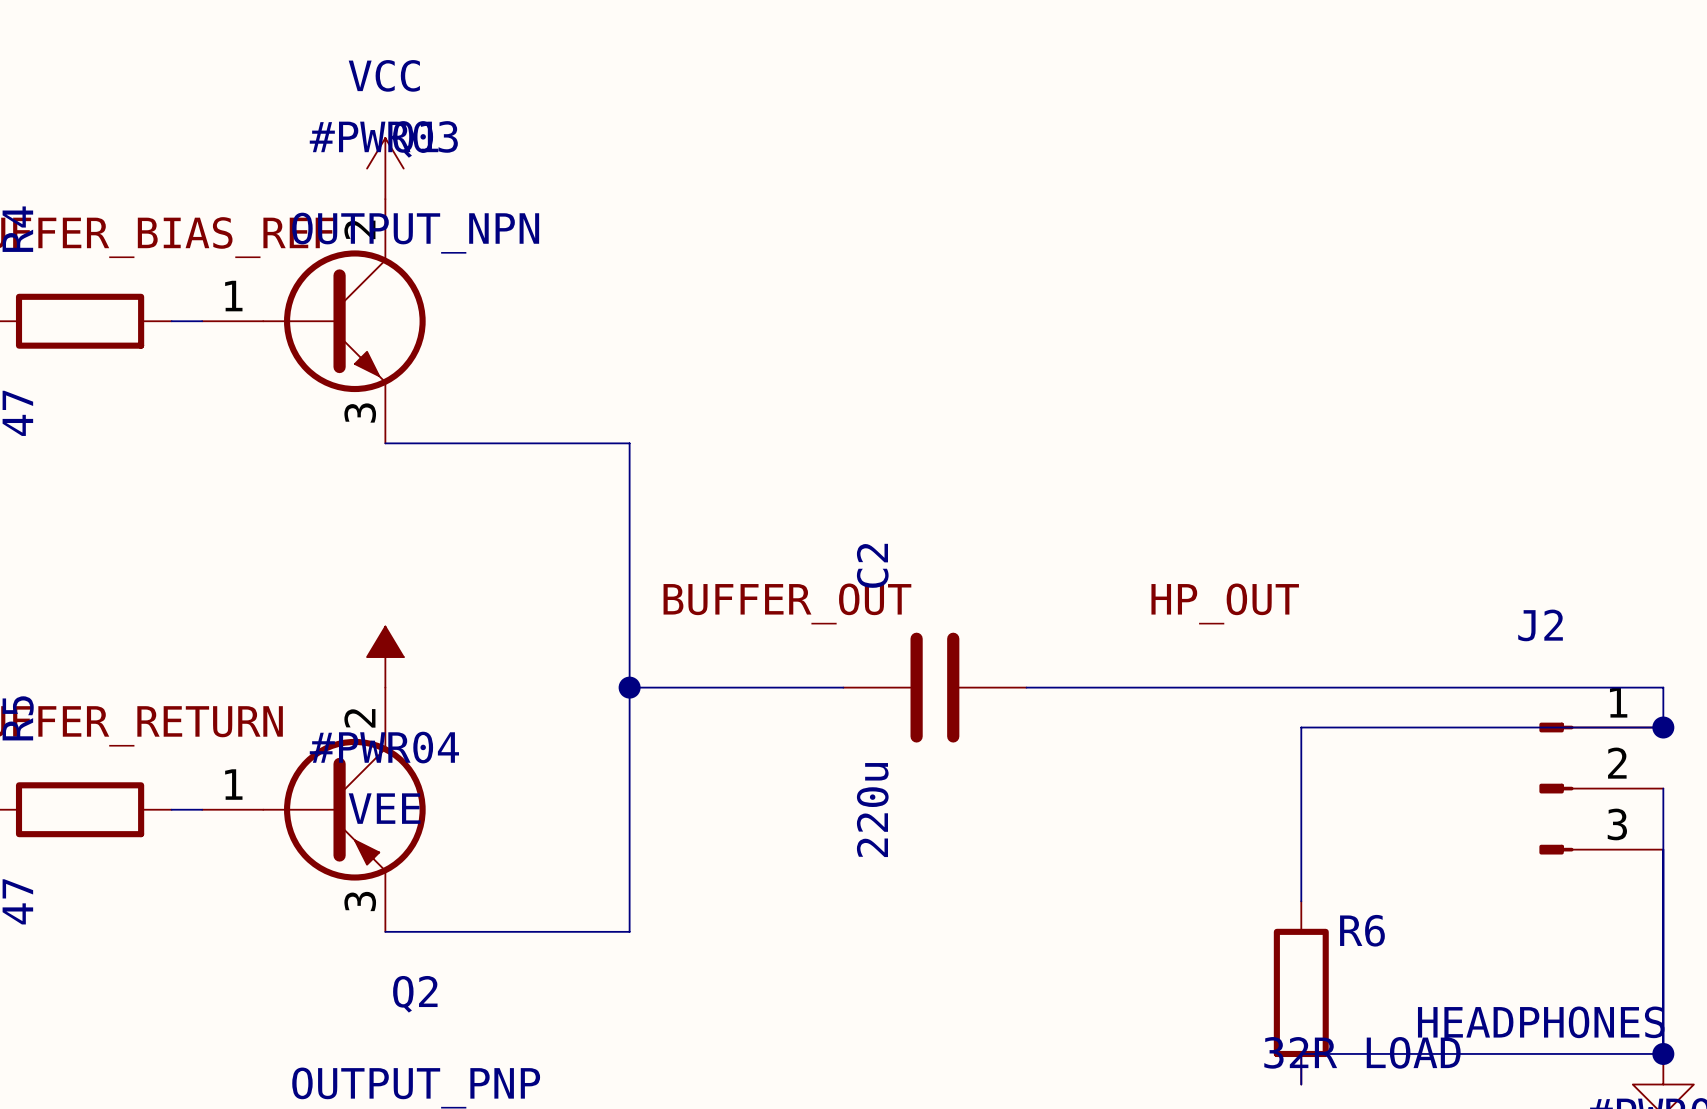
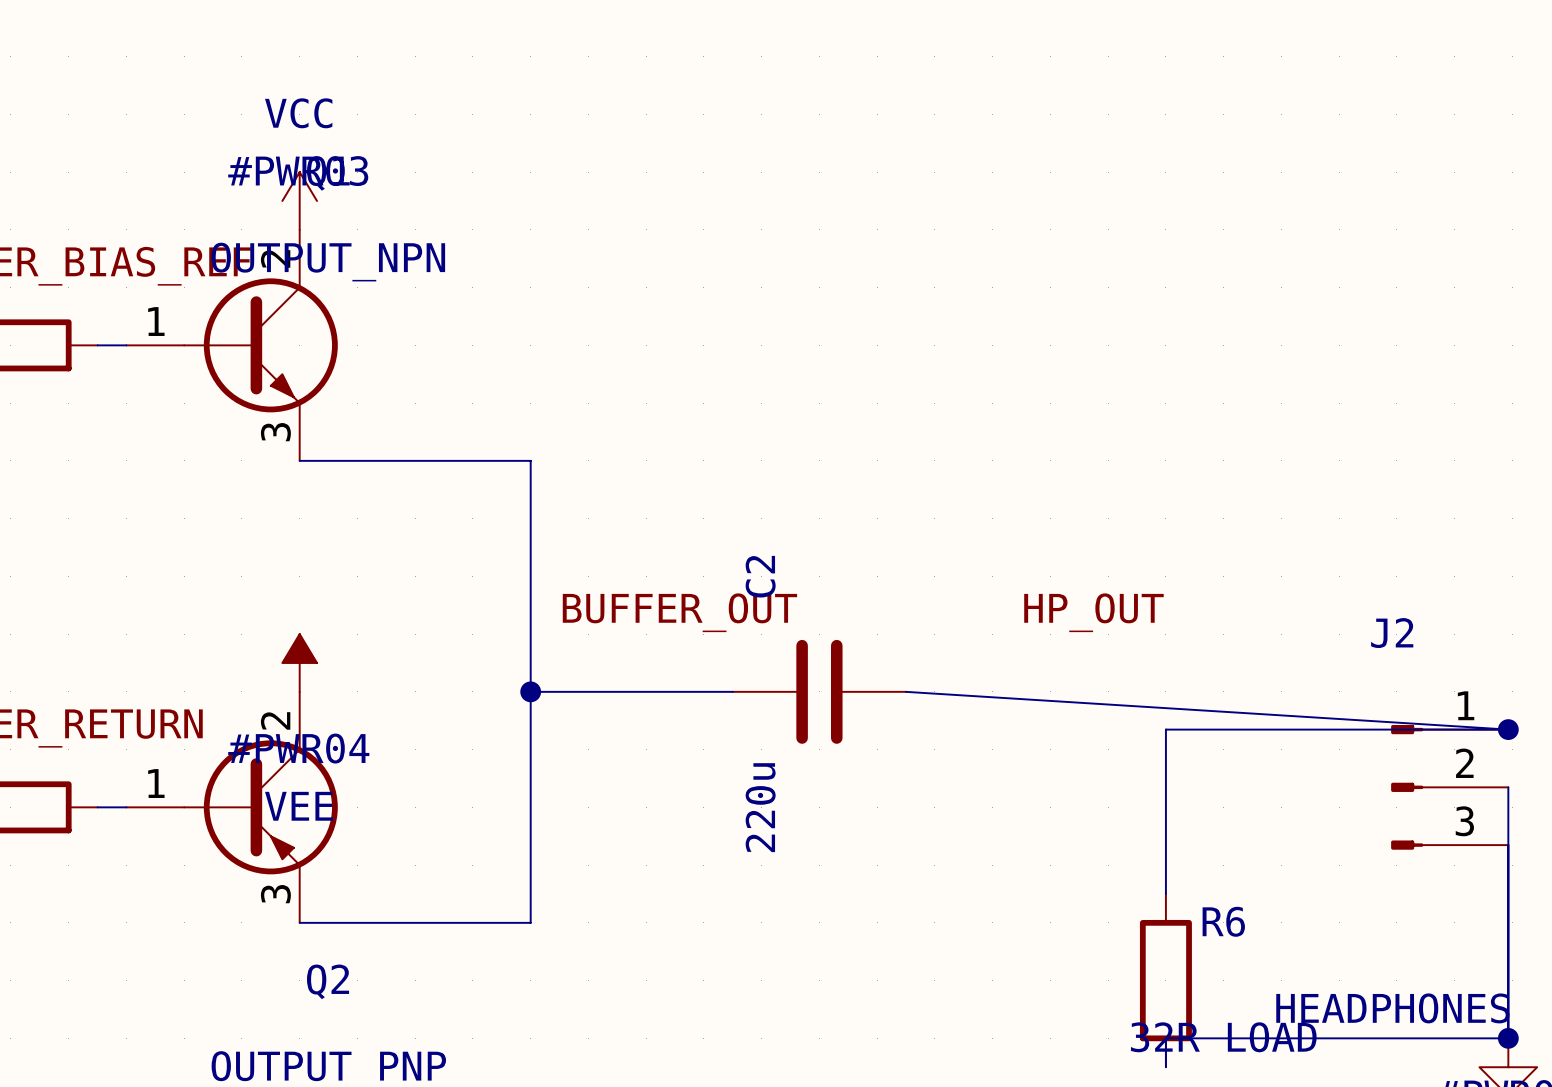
wire: (1026, 687) (1663, 687) (1663, 727) -> (906, 691) (1508, 729)

